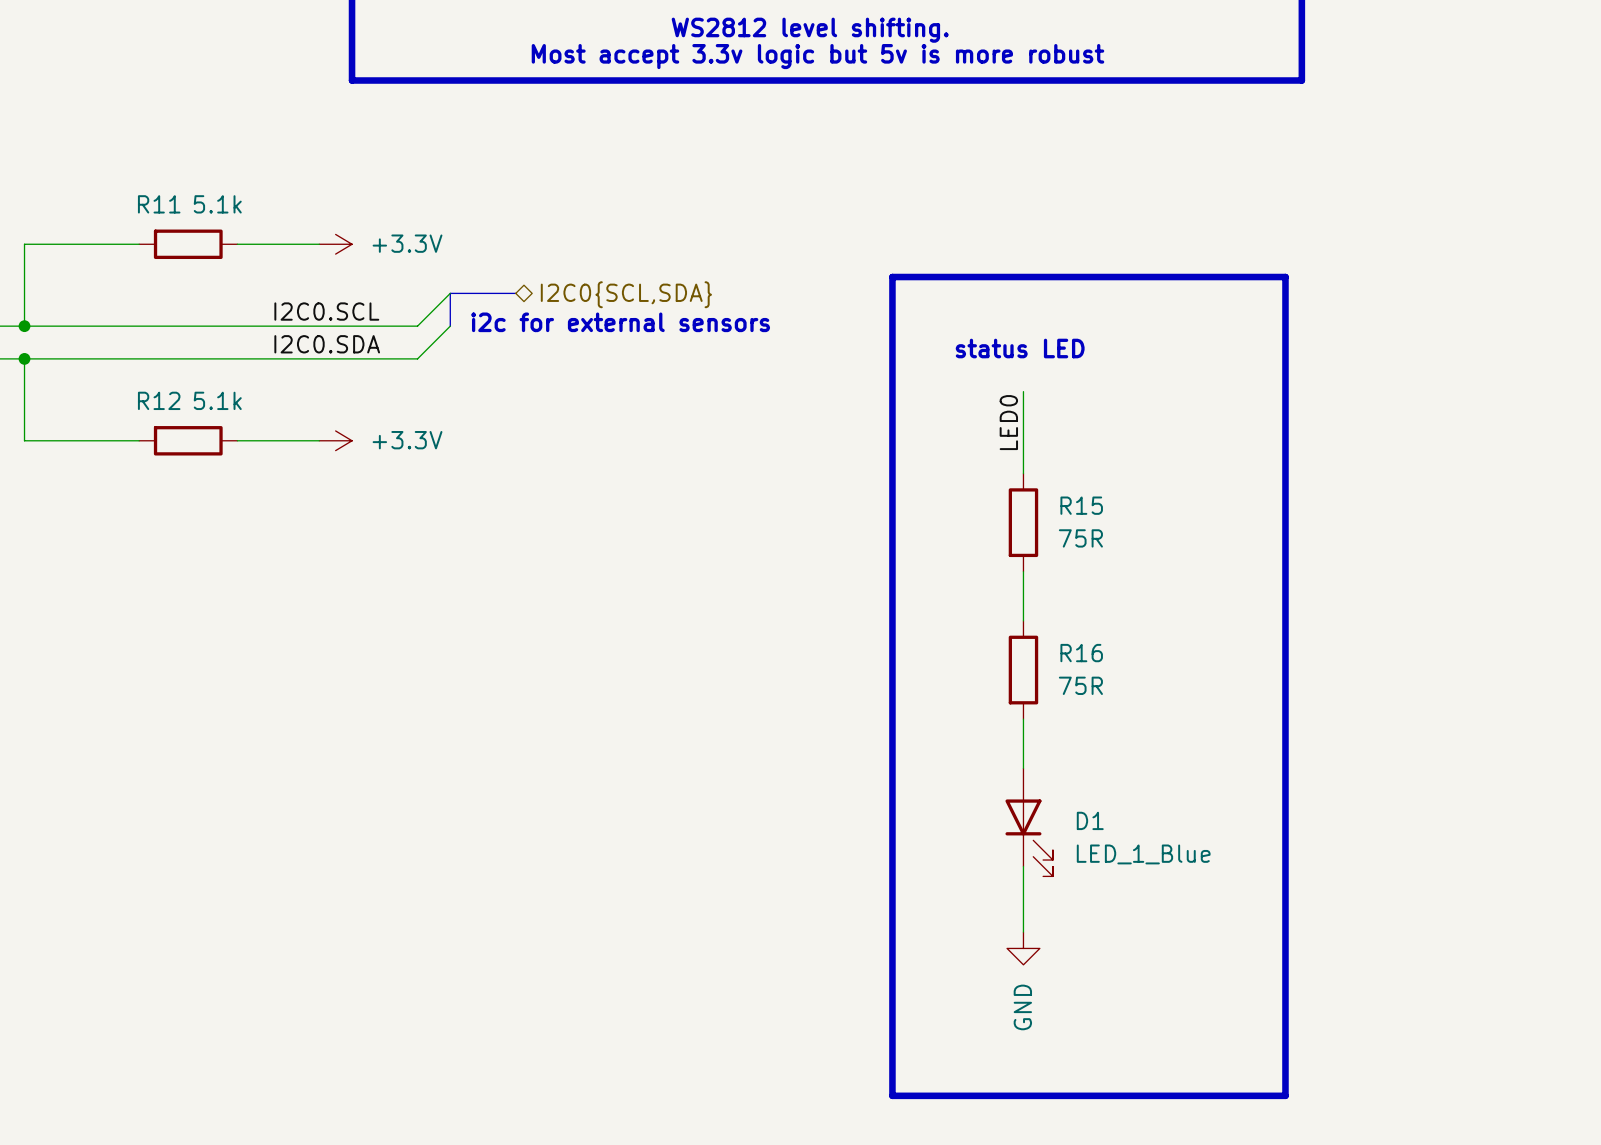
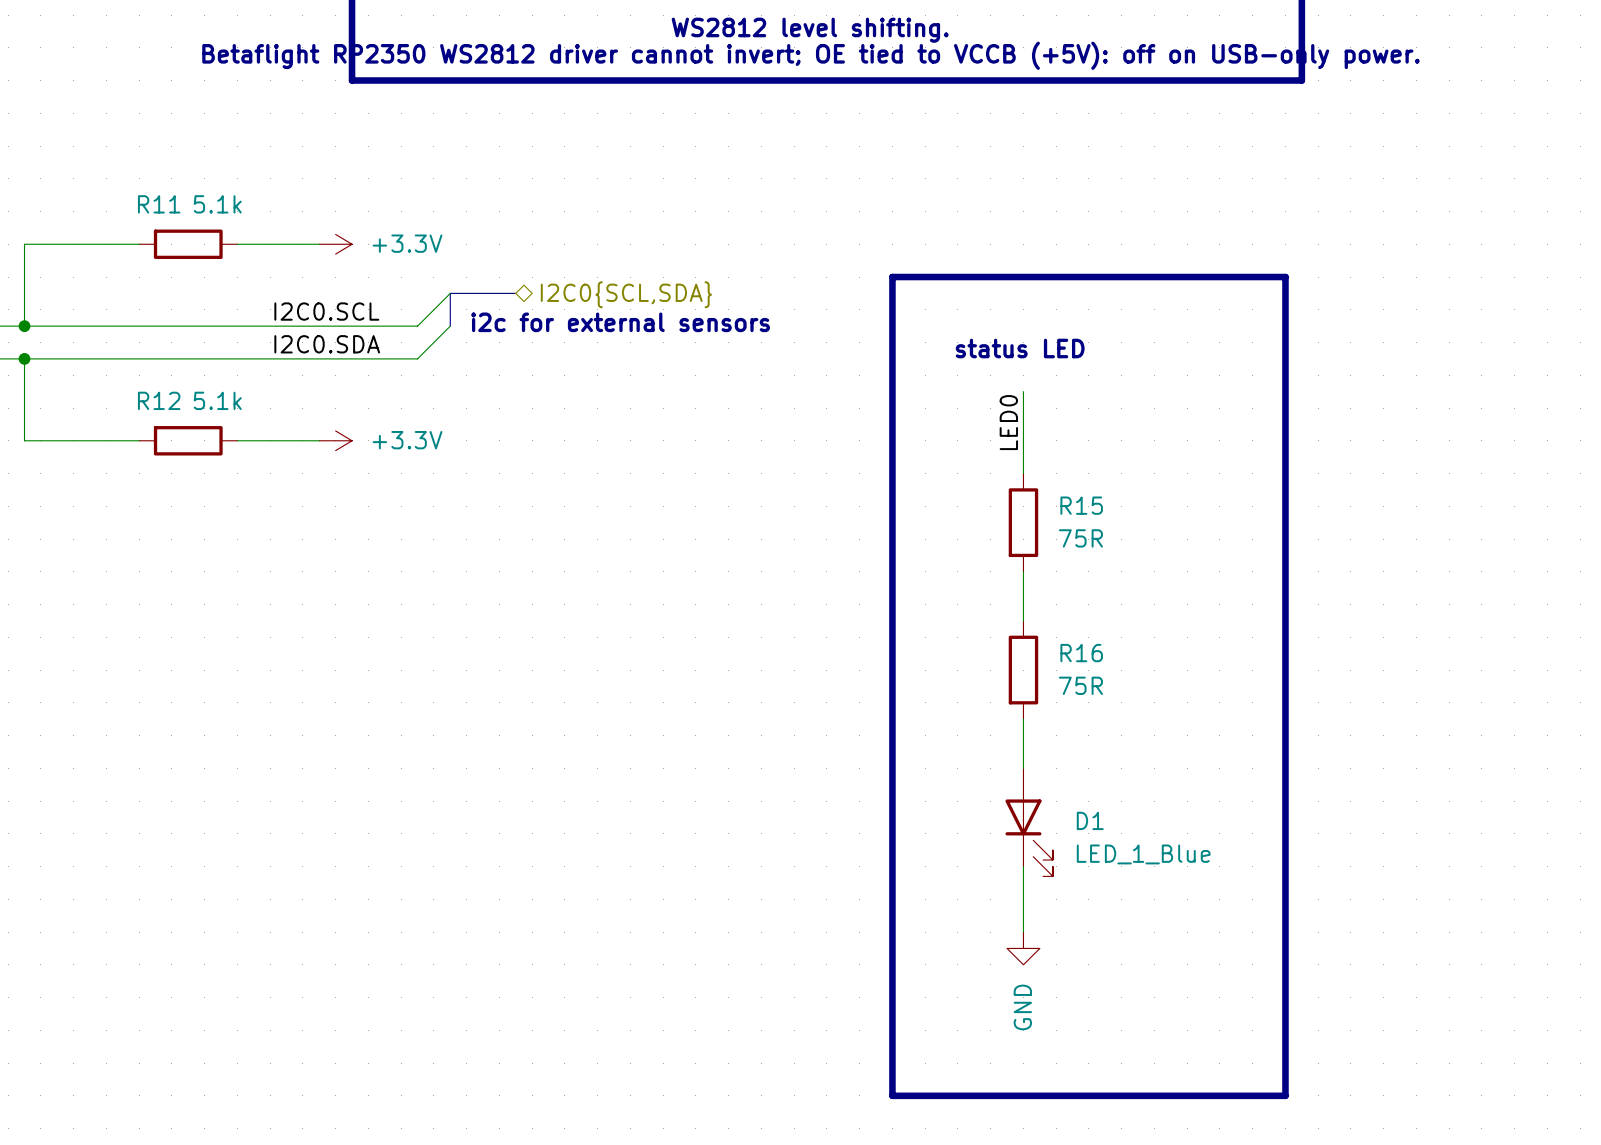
text: Most accept 3.3v logic but 5v is more robust (817, 56) -> Betaflight RP2350 WS2812 driver cannot invert; OE tied to VCCB (+5V): off on USB-only power. (810, 55)

